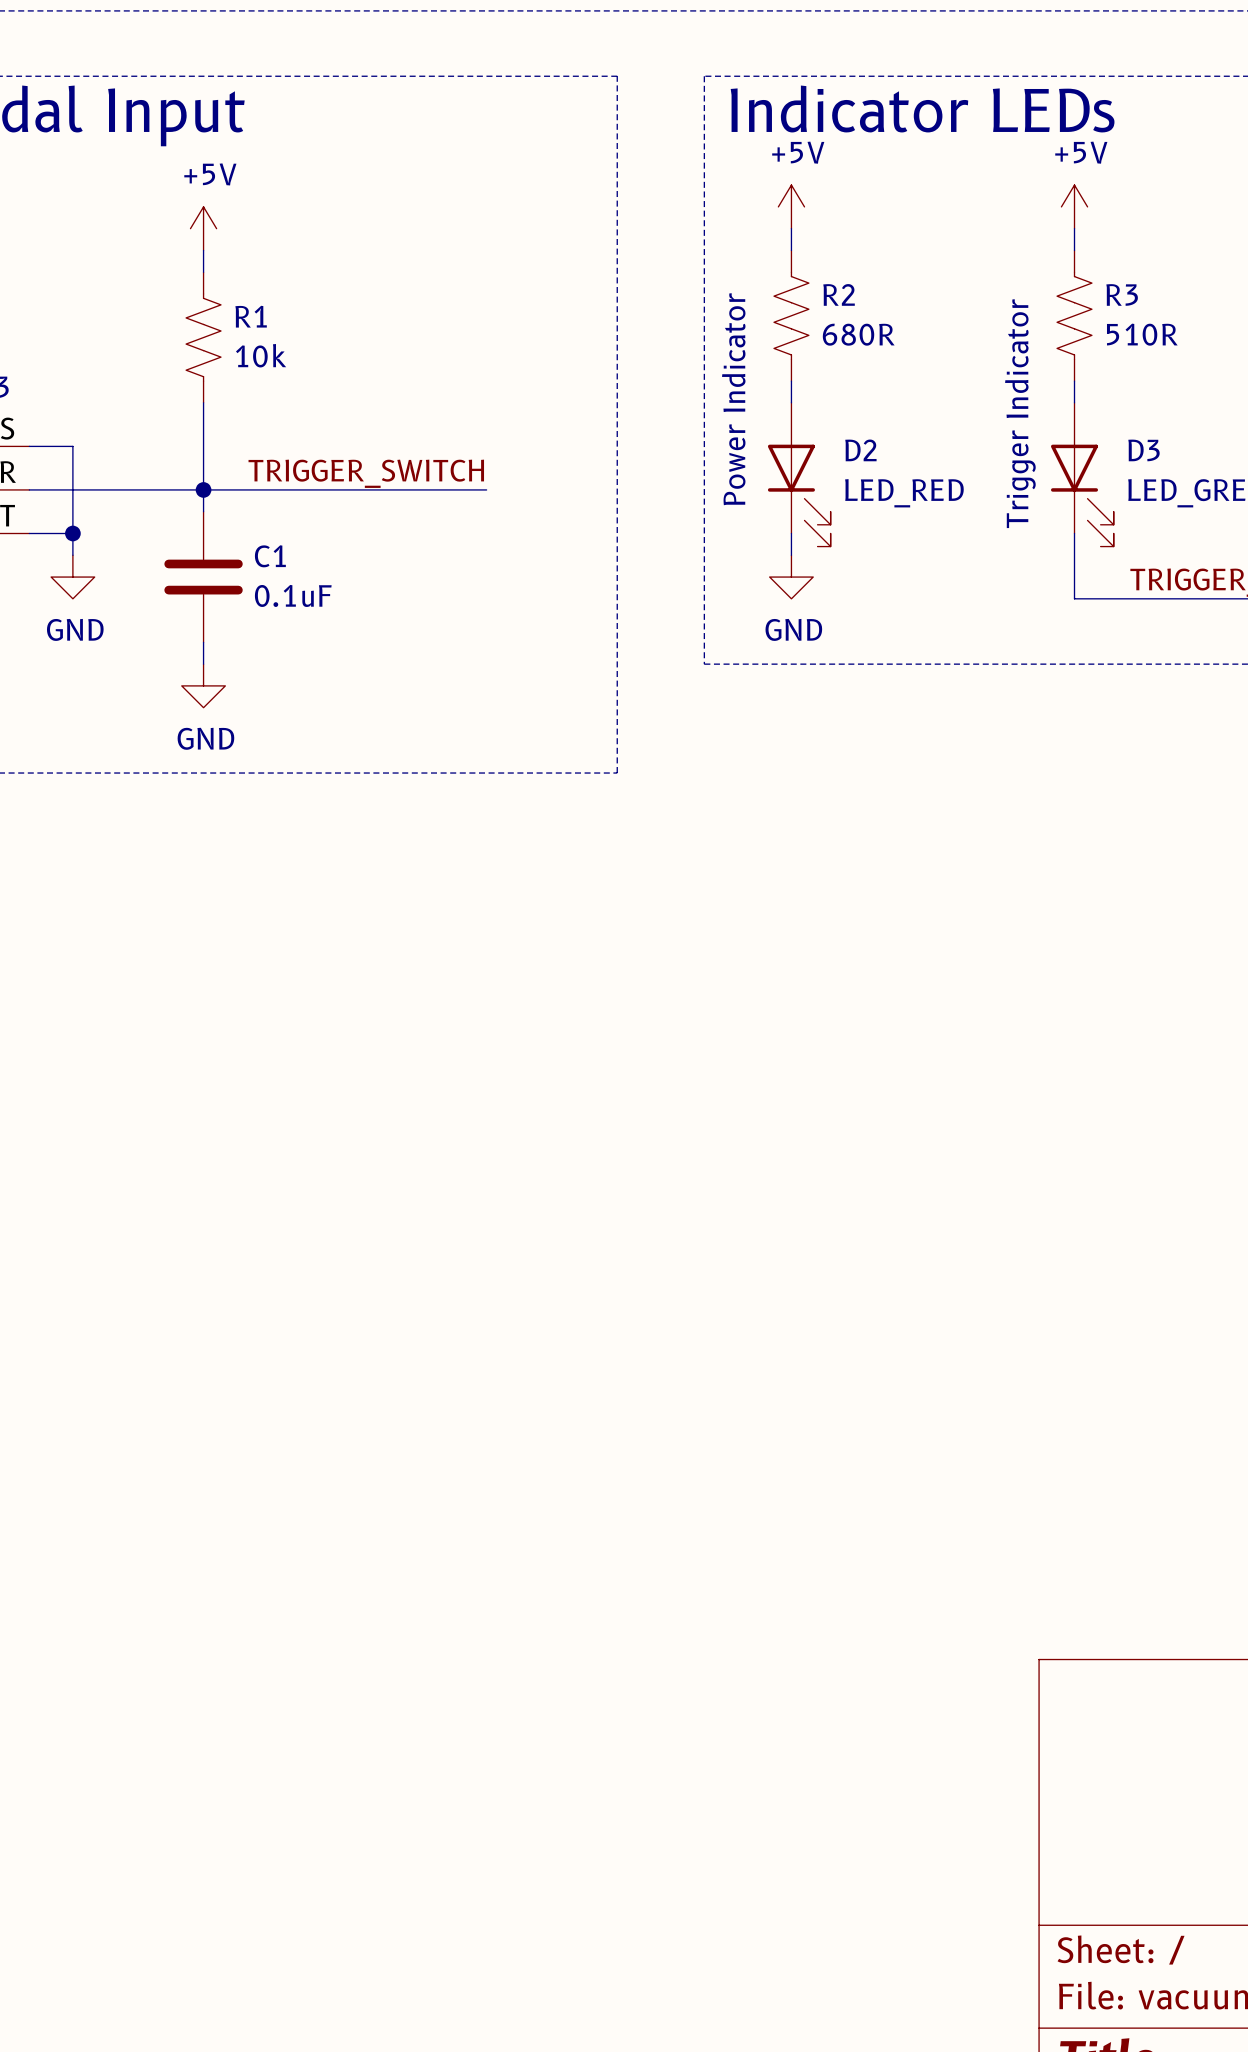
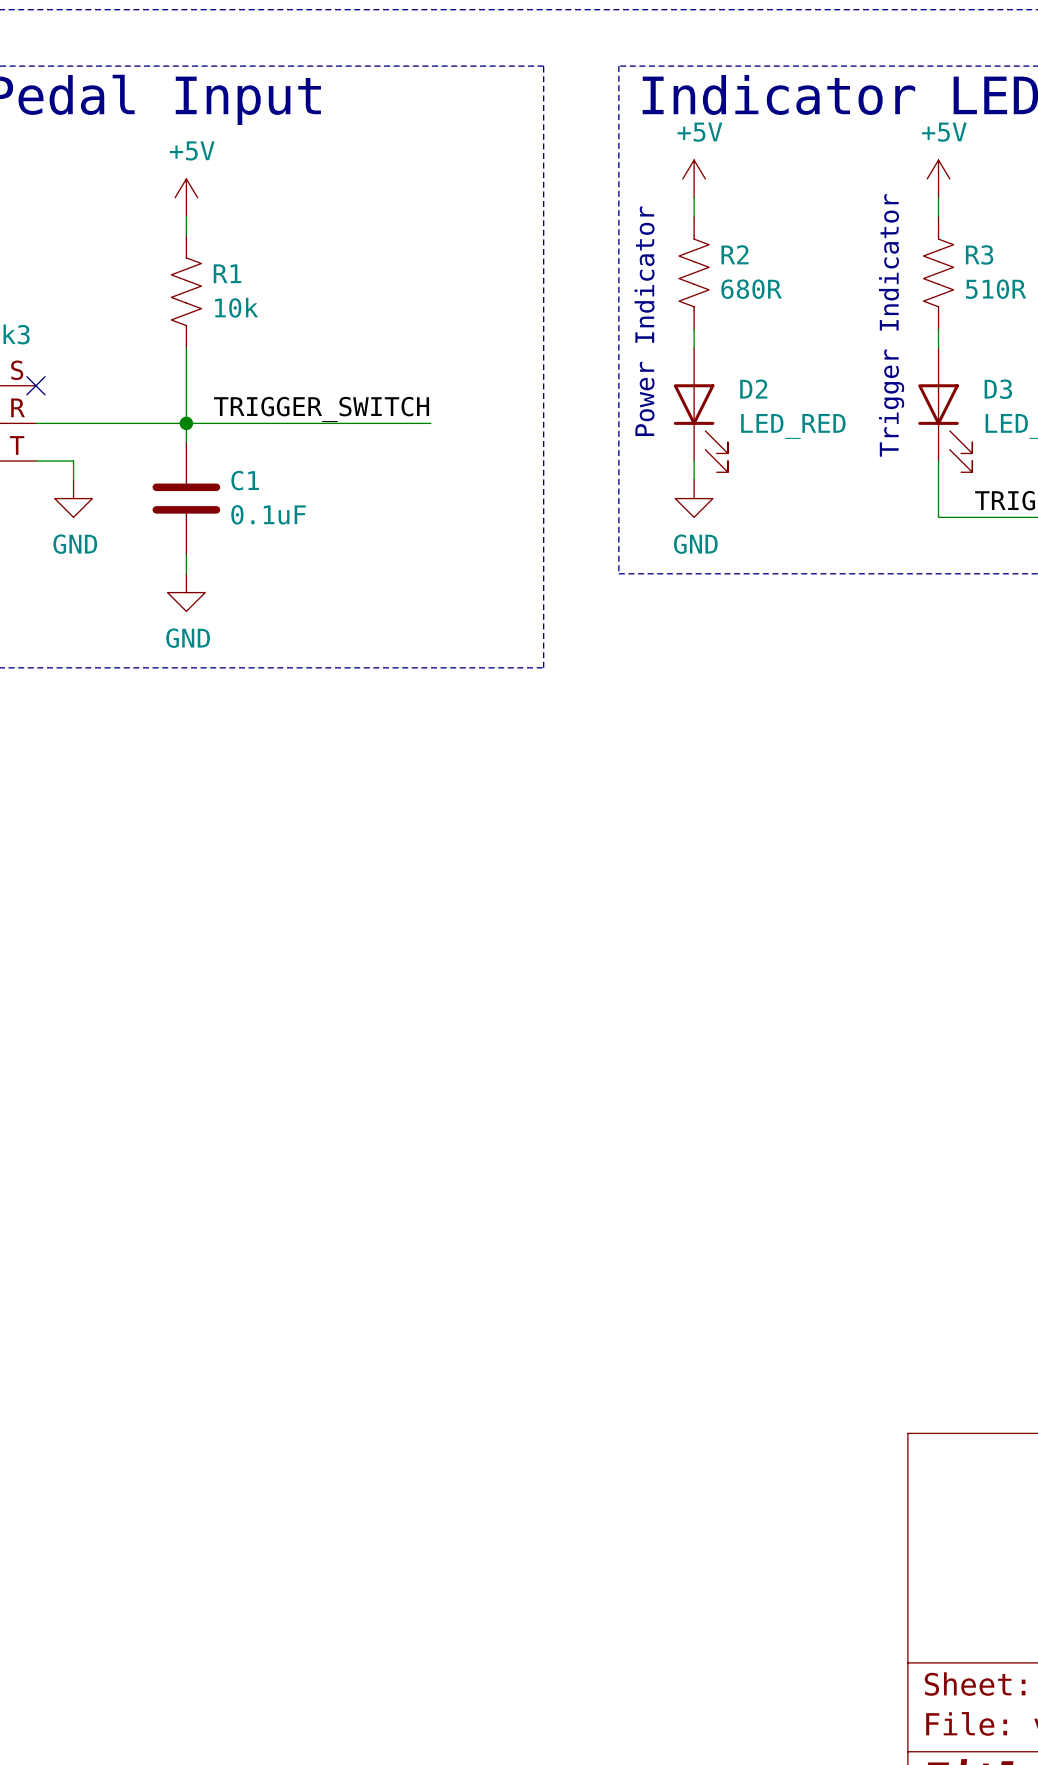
wire: (29, 446) (72, 446) (72, 533) -> none
no-connect mark: none -> (35, 385)
junction: (72, 533) -> none

